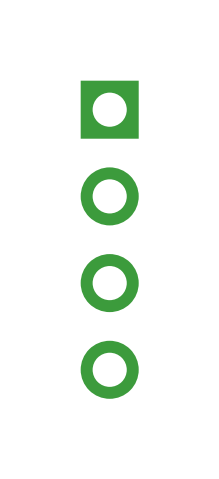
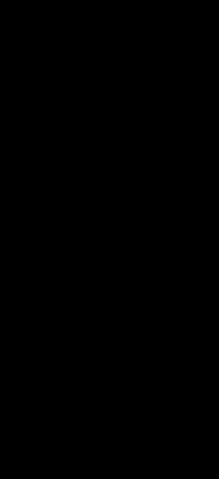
part: (109, 239) -> none

